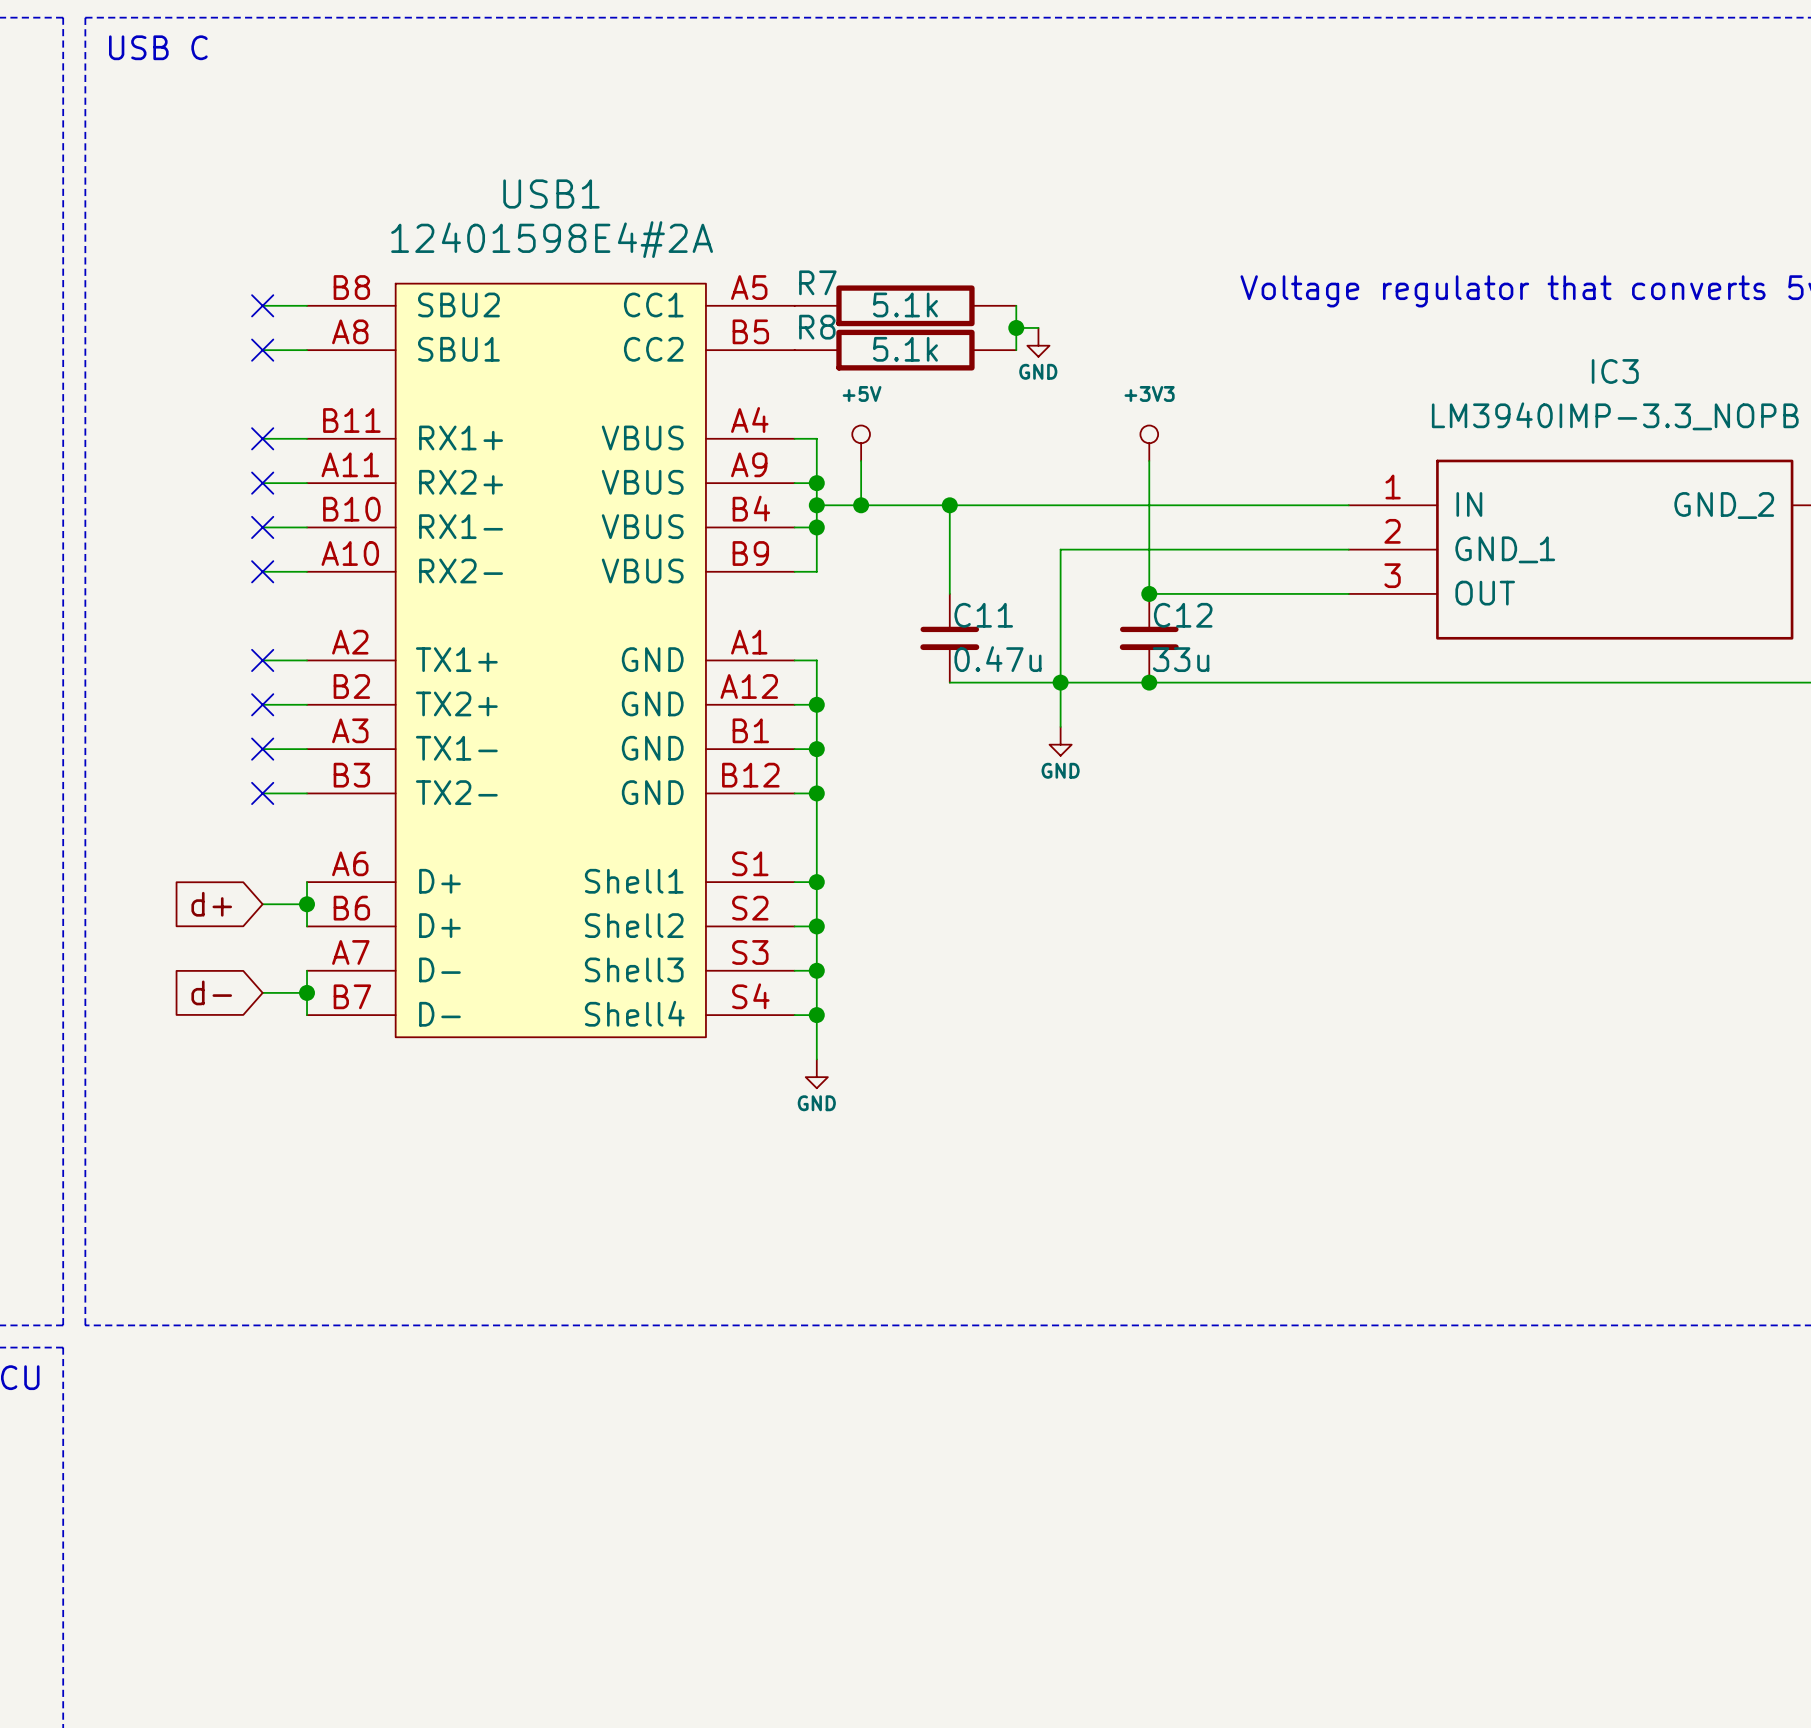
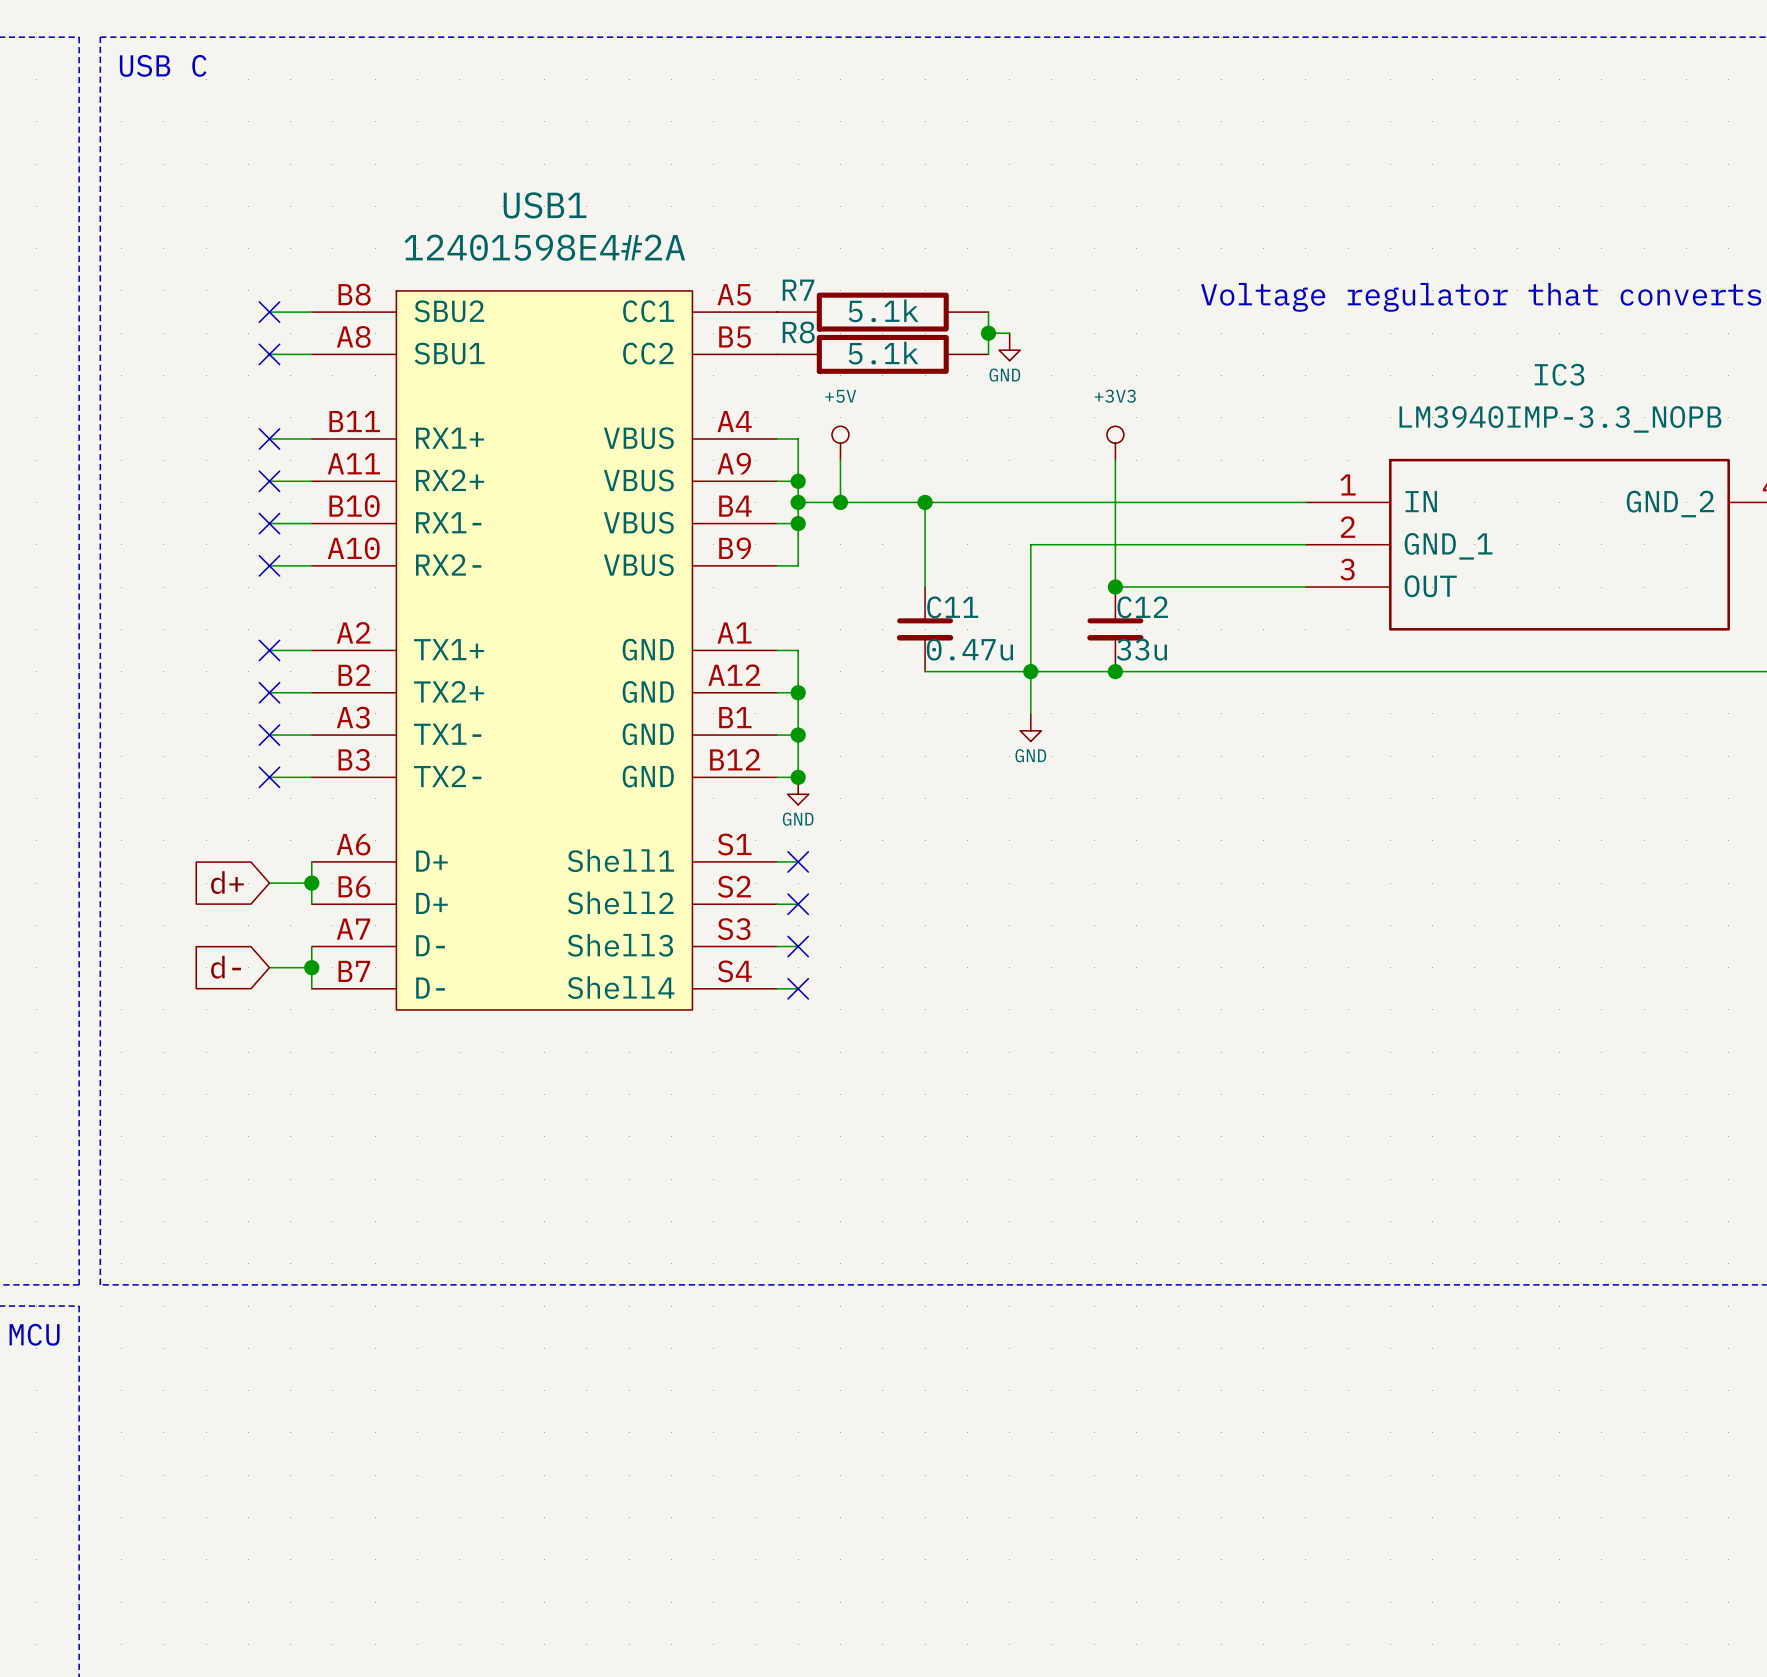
wire: (816, 793) (816, 1059) -> none
junction: (816, 882) -> none
no-connect mark: none -> (798, 861)
junction: (816, 926) -> none
no-connect mark: none -> (798, 904)
junction: (816, 970) -> none
no-connect mark: none -> (798, 946)
junction: (816, 1015) -> none
no-connect mark: none -> (798, 988)
power symbol position: GND (816, 1073) -> GND (798, 791)

